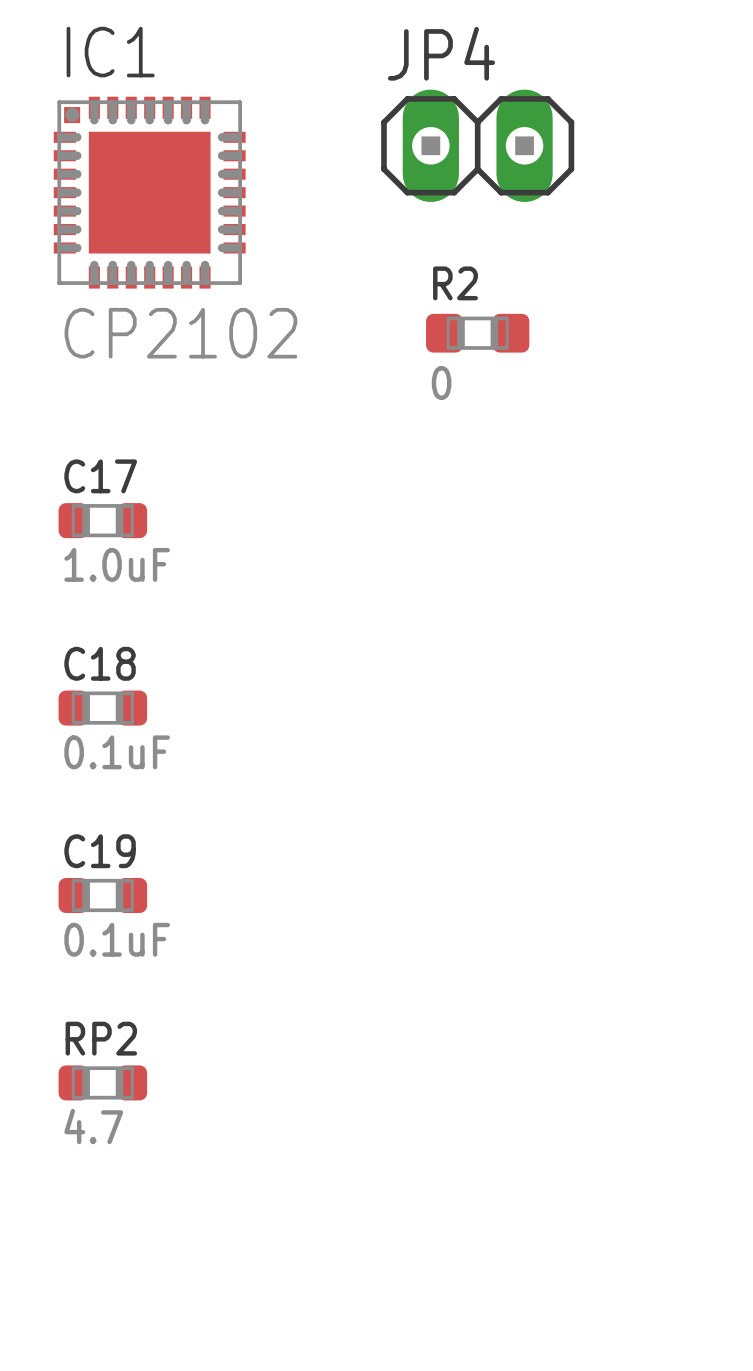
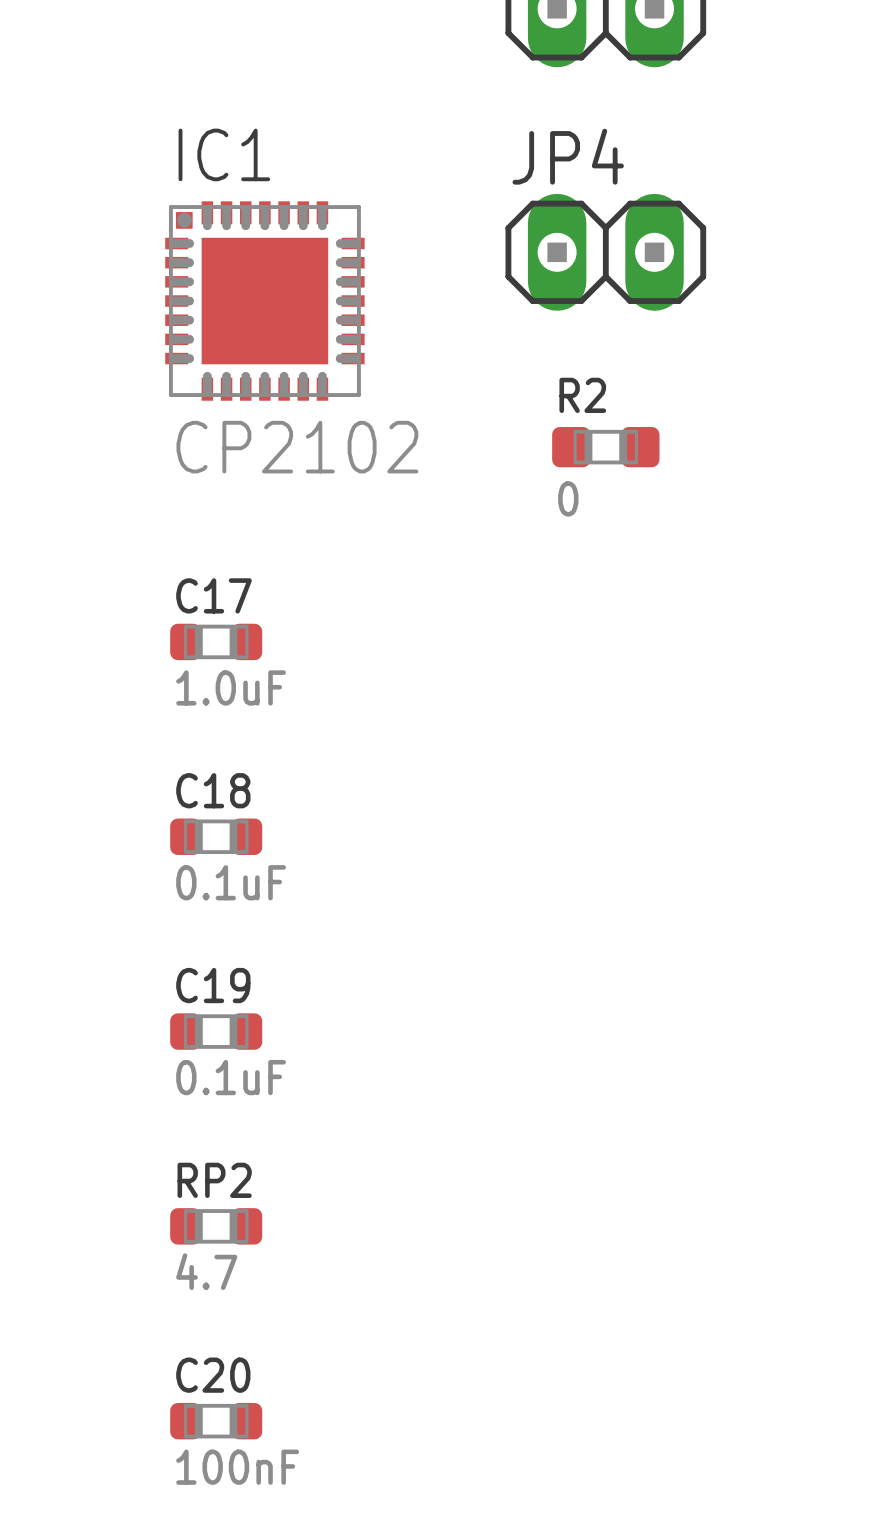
C20: none -> 100nF (216, 1421)

